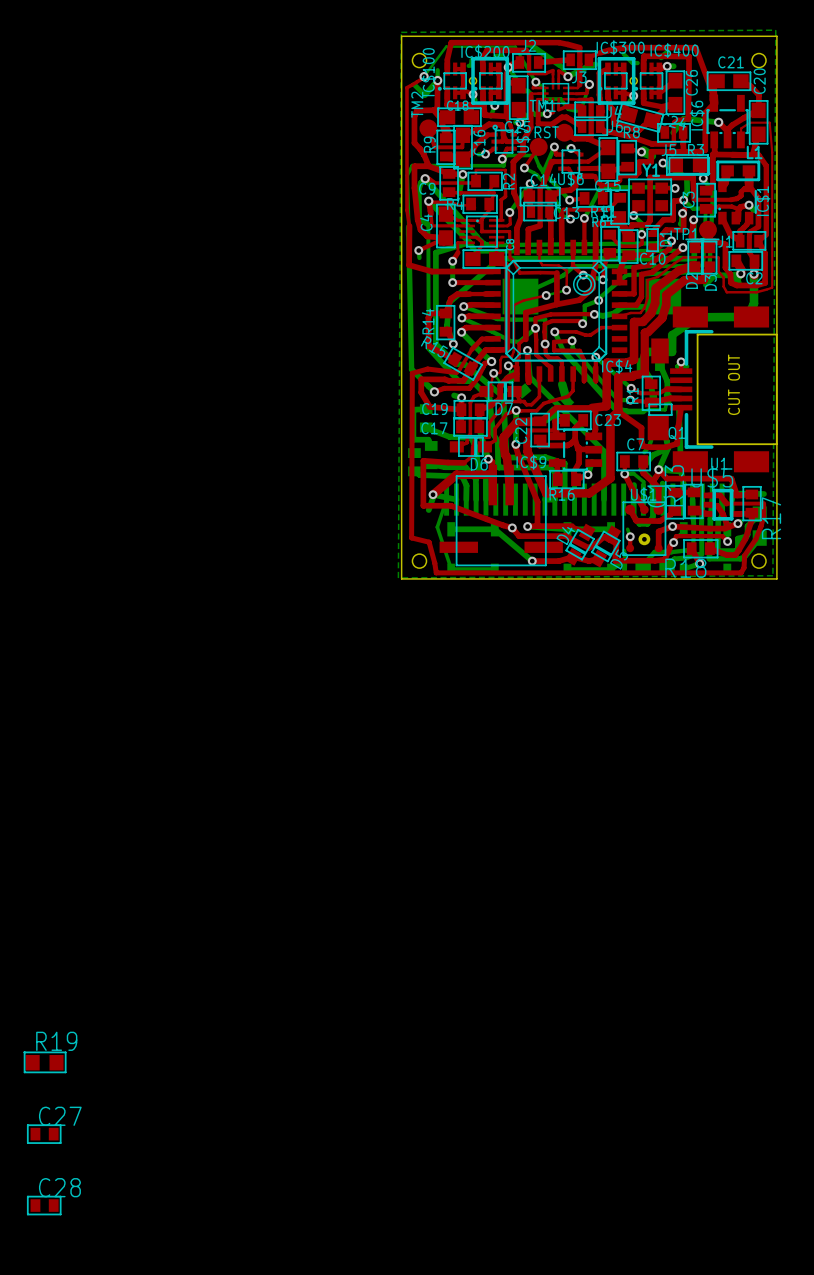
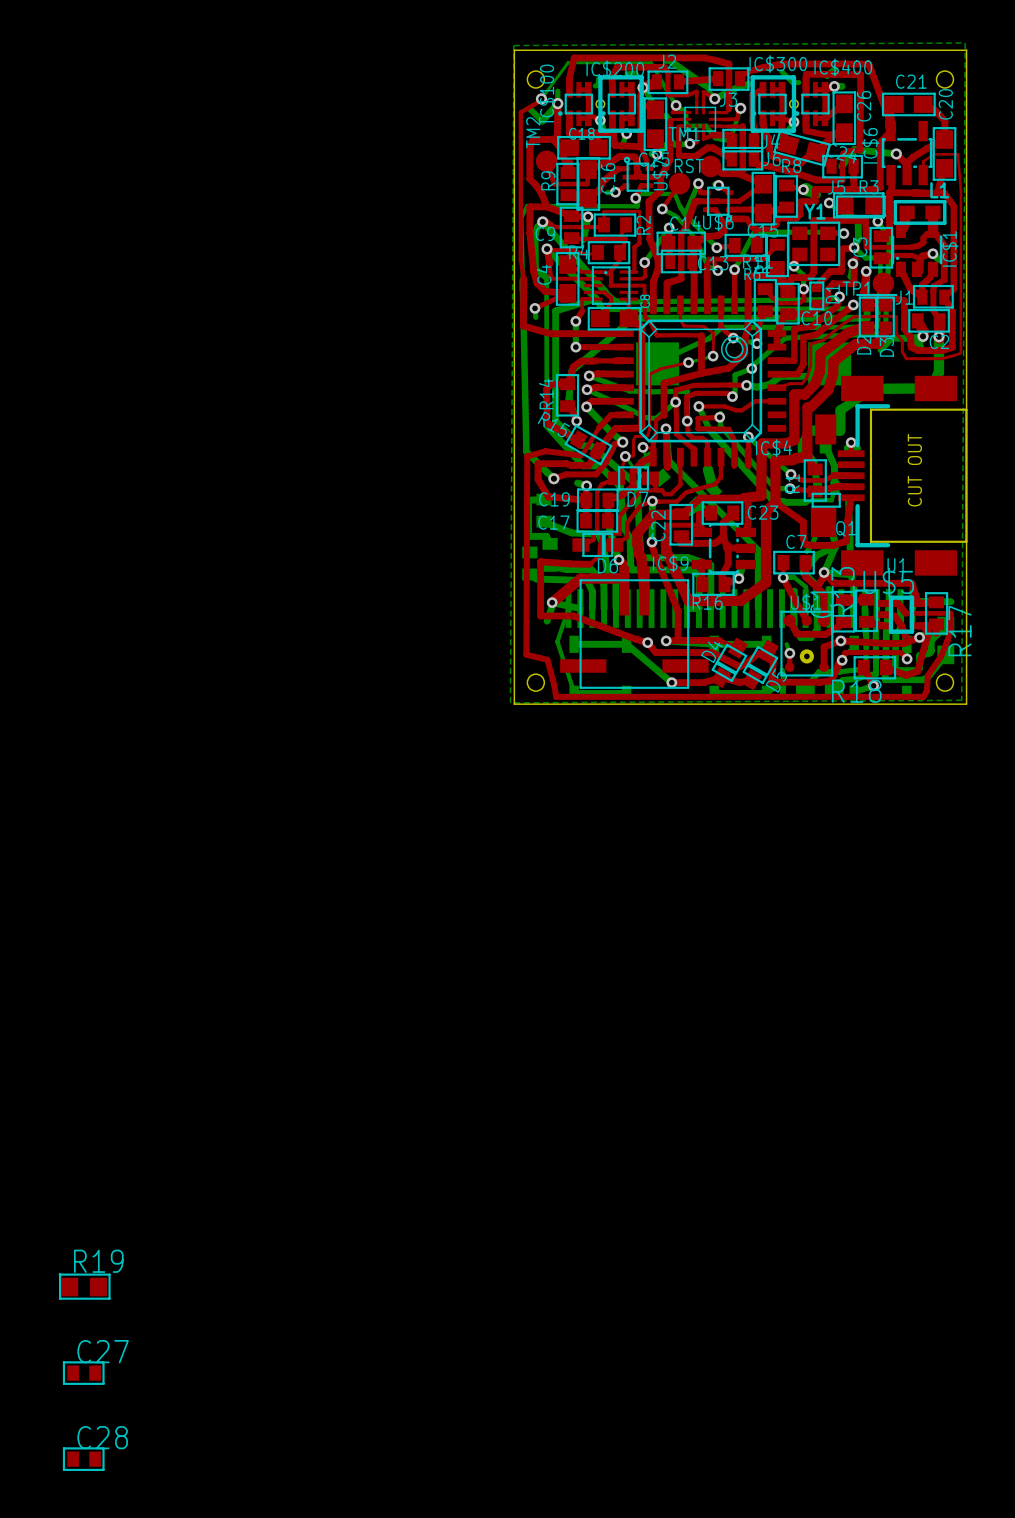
top track: (751, 512) (751, 520) (745, 538) (739, 550) (735, 555) (726, 555) -> (918, 625) (922, 625) (928, 632) (917, 671) (906, 675)

